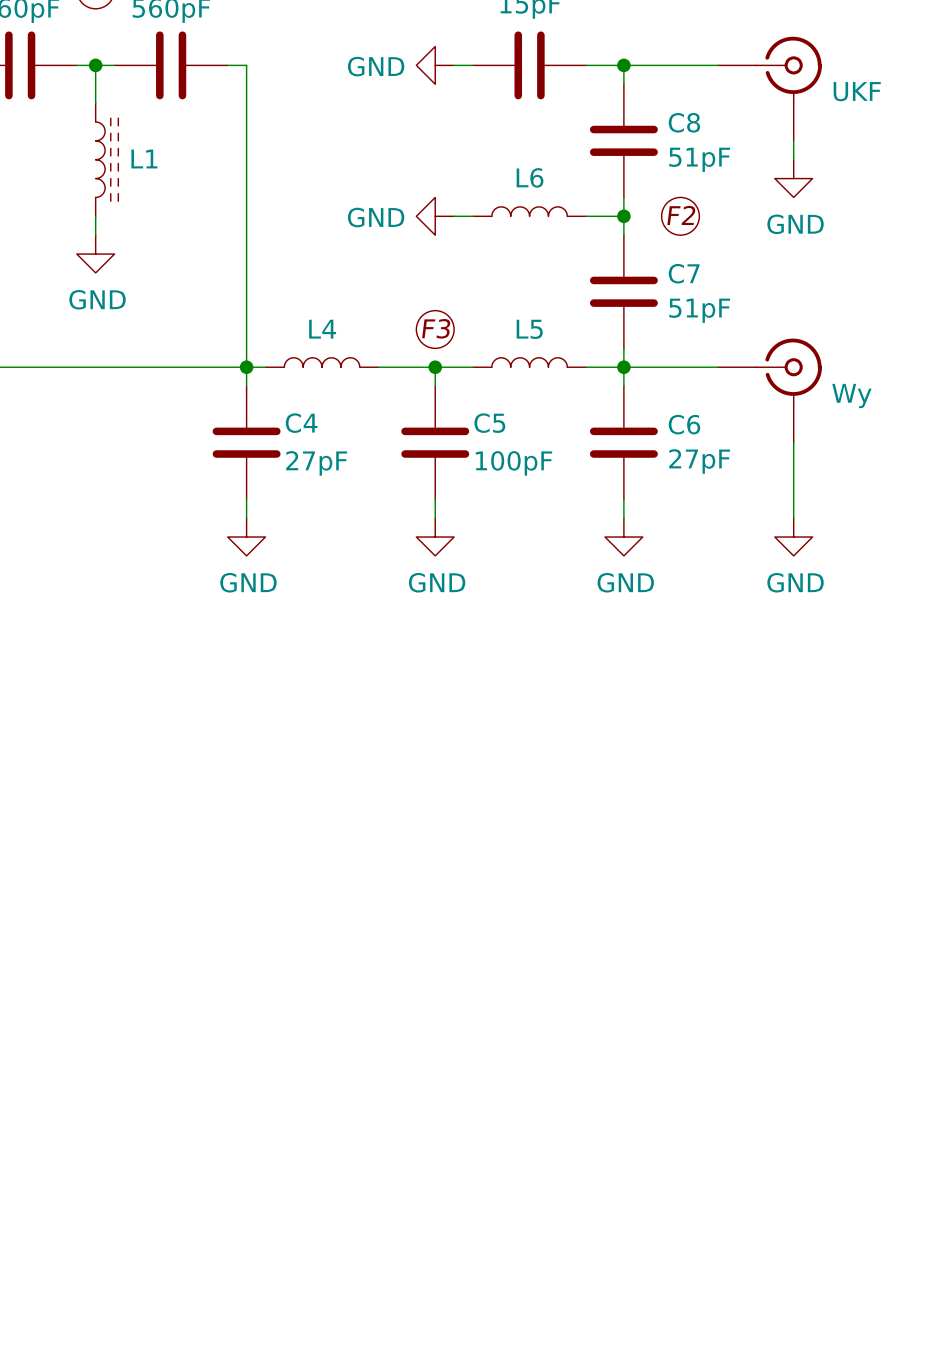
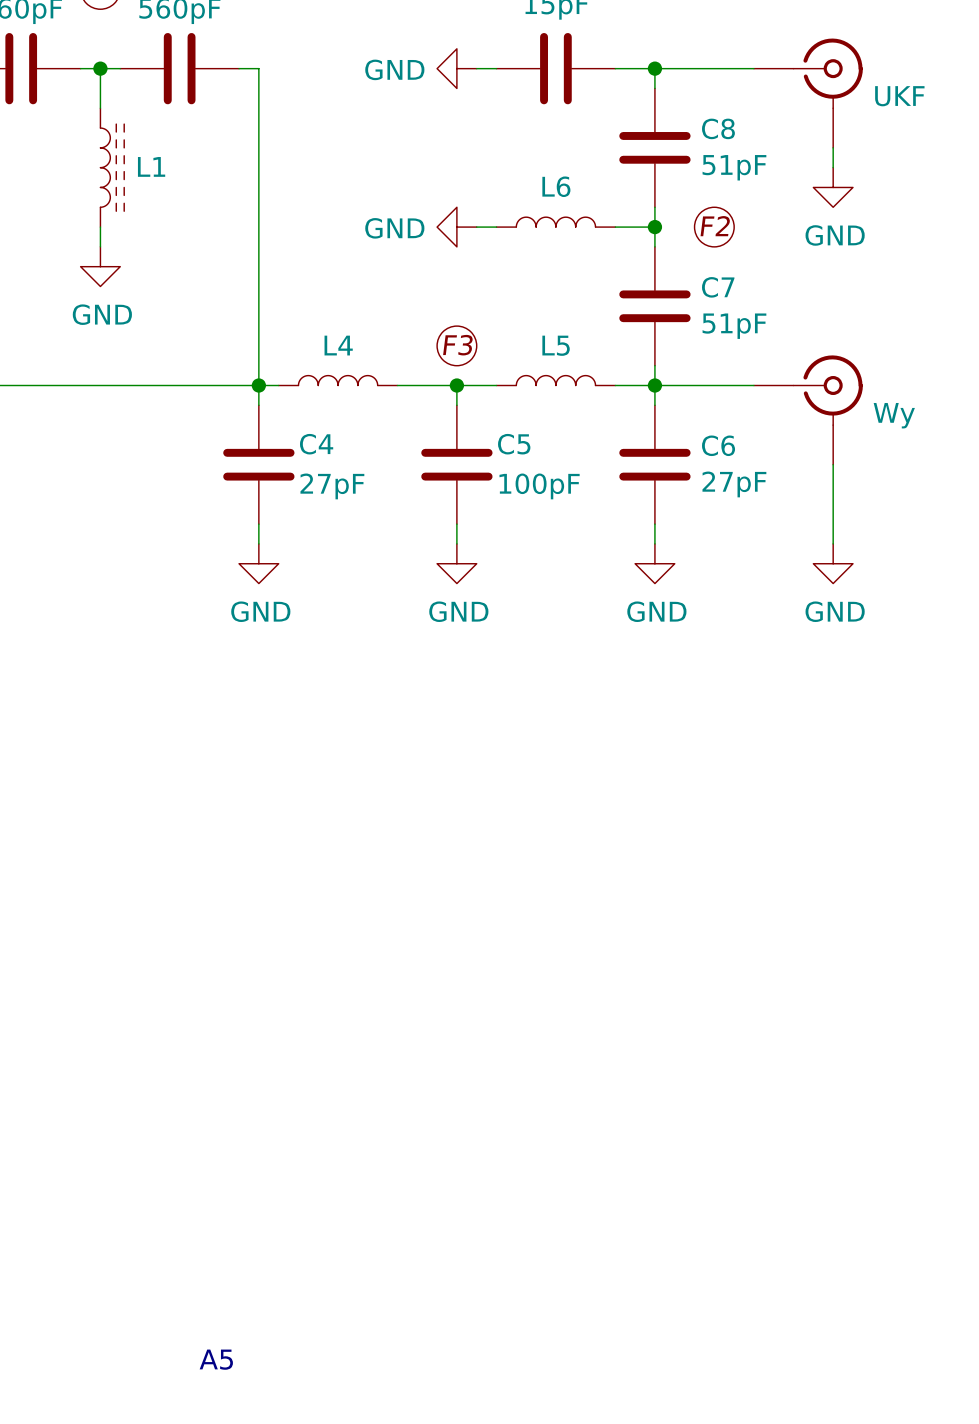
text: none -> A5 (216, 1359)

